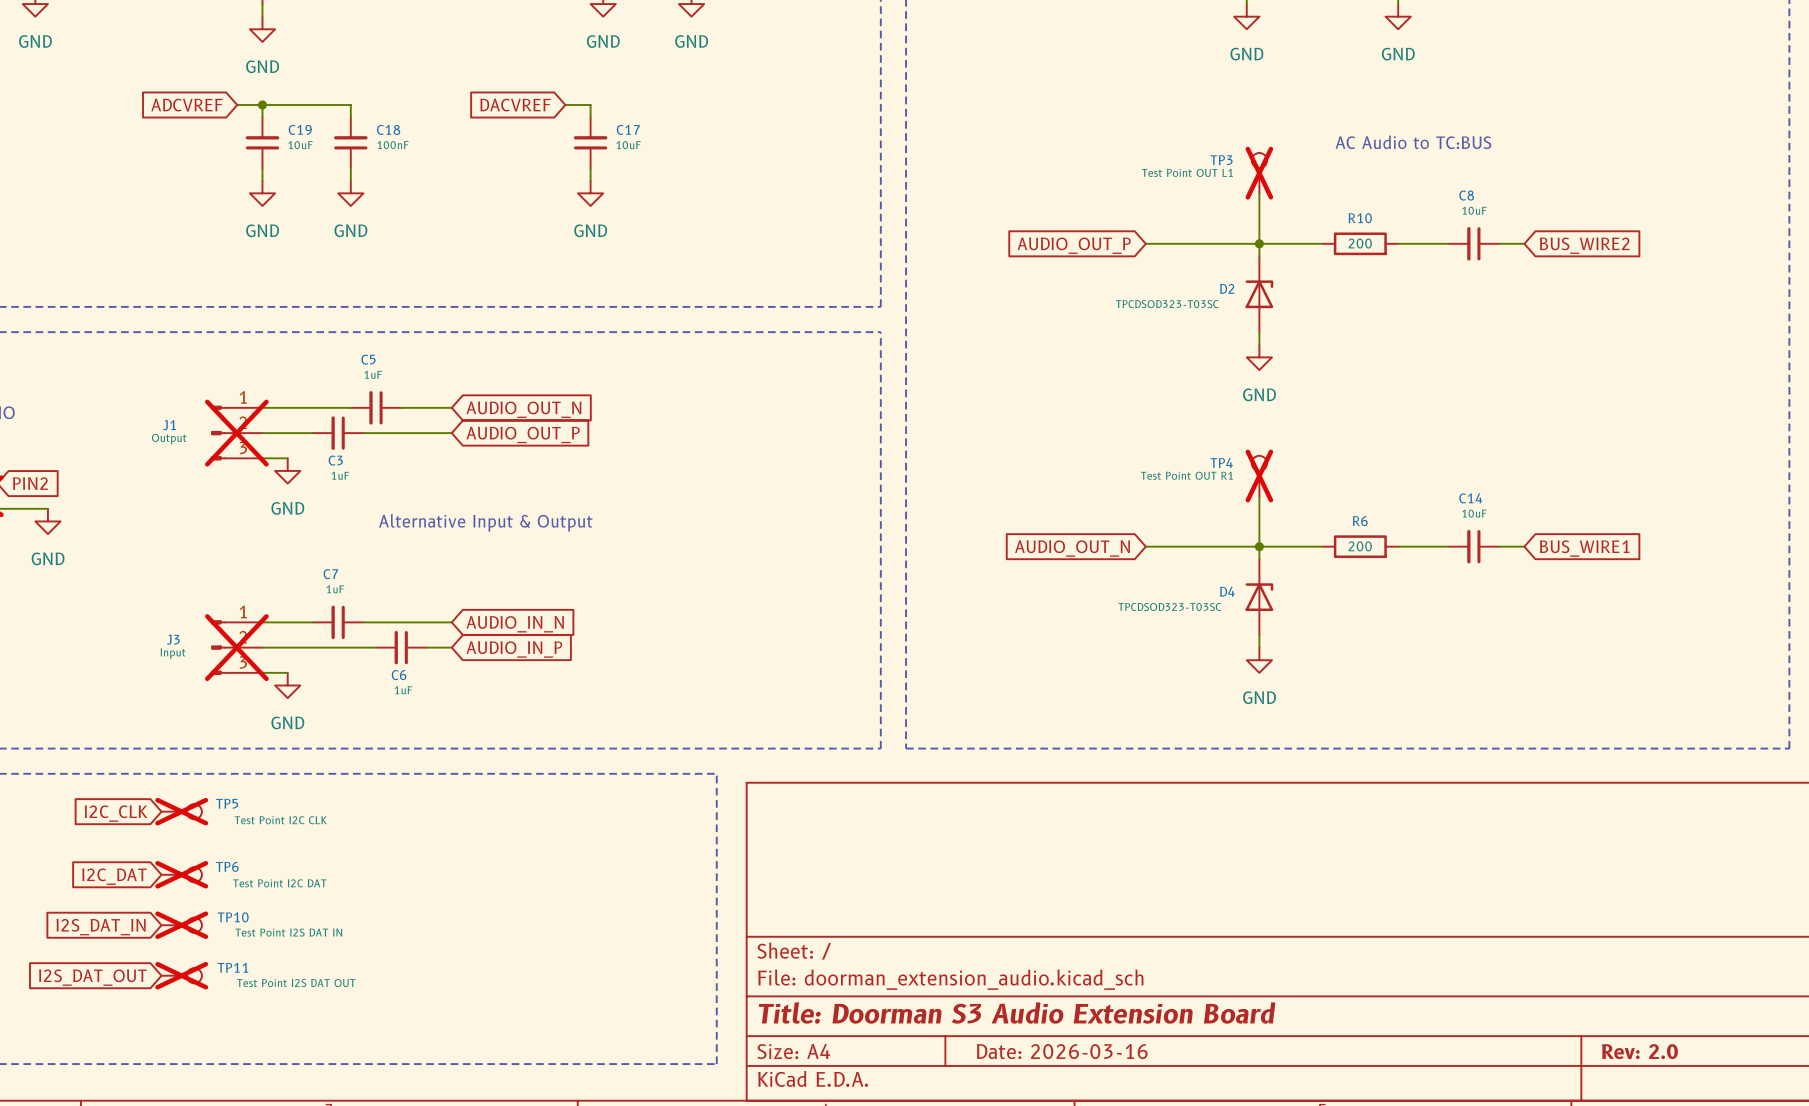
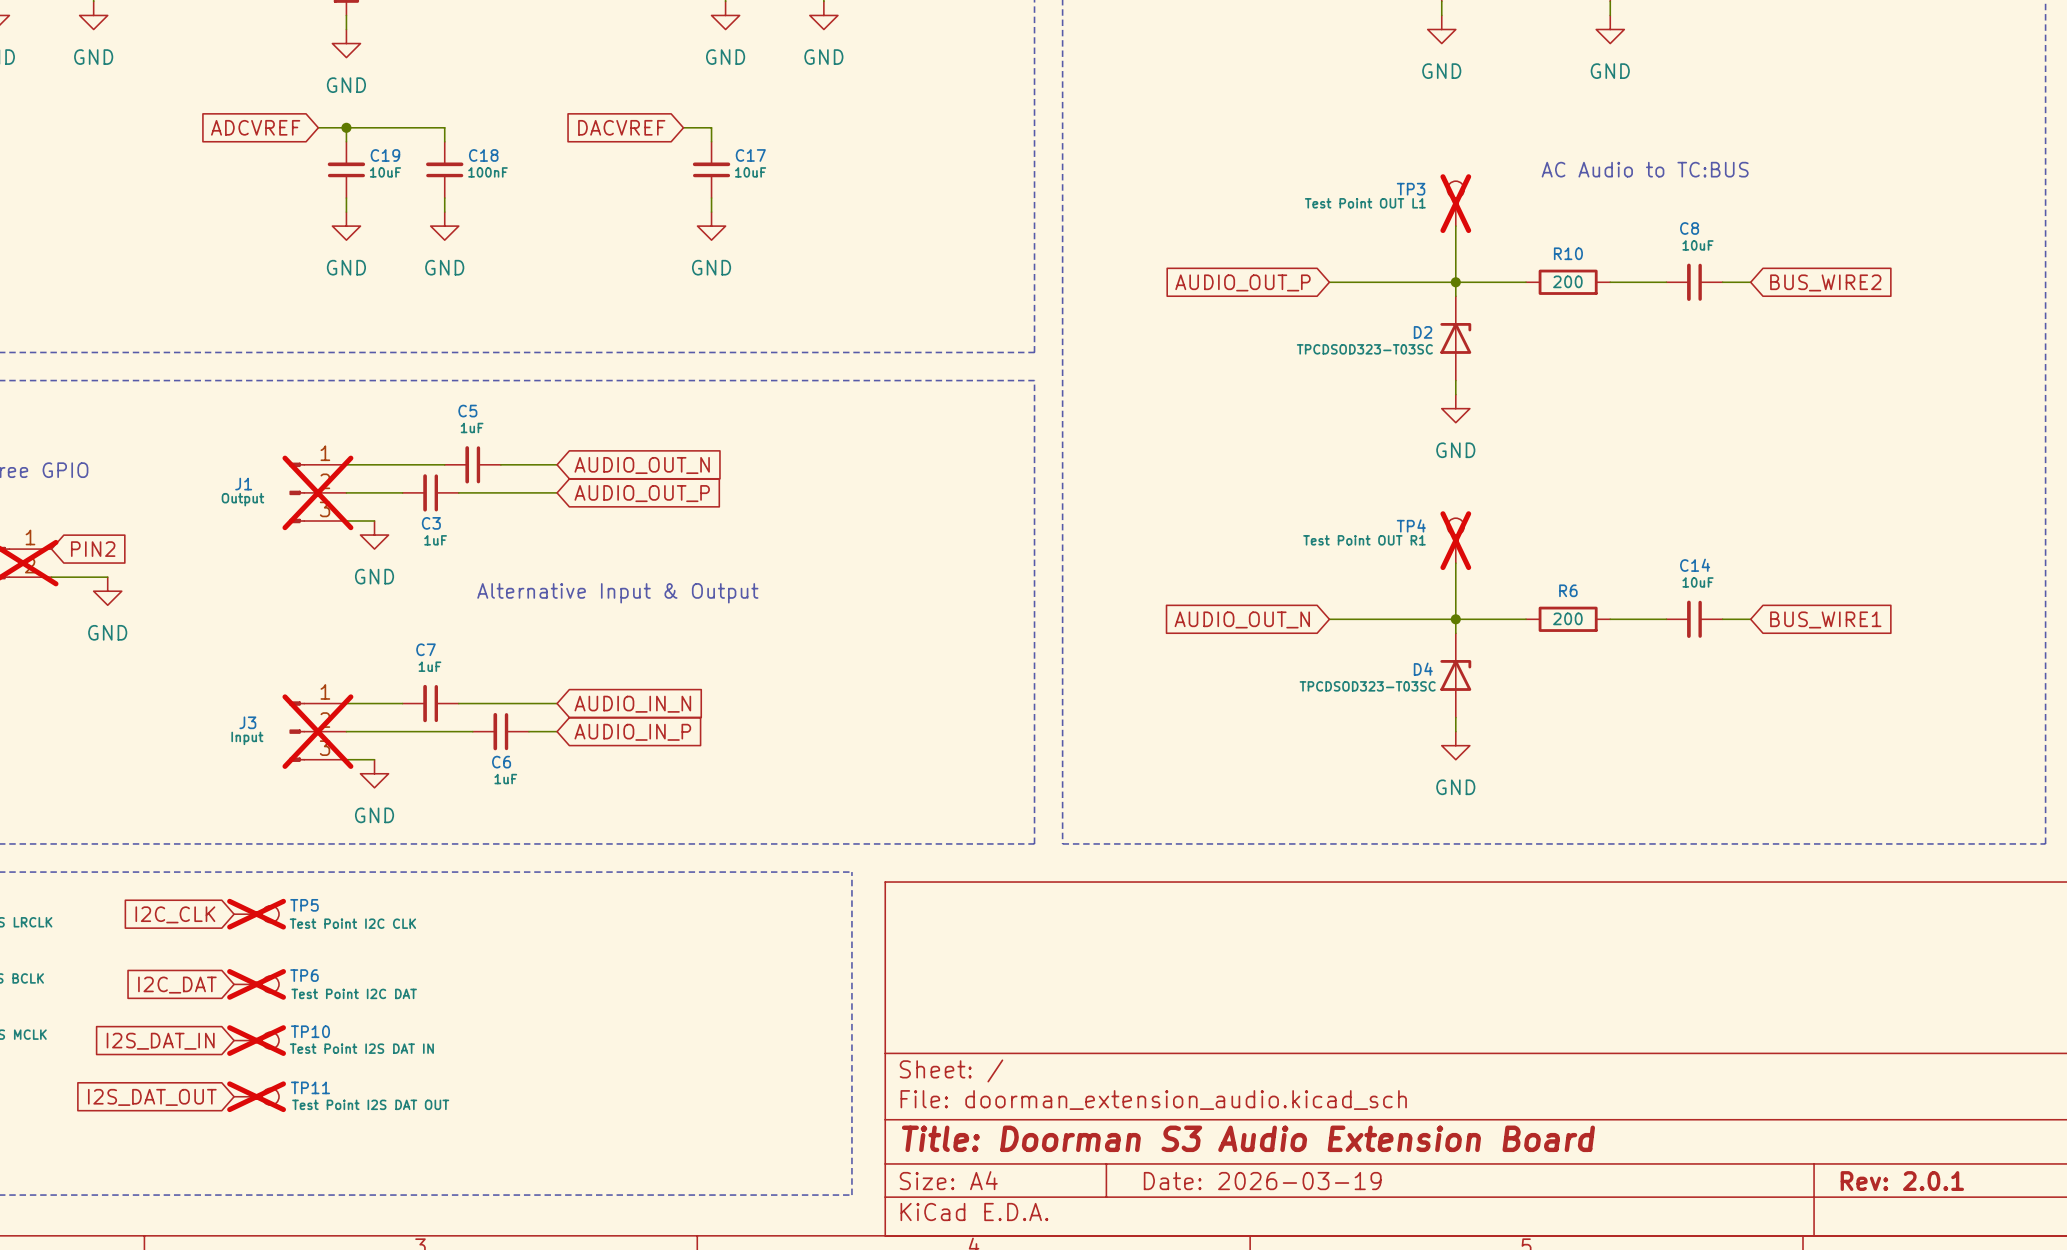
title block: Date: 2026-03-16 (1062, 1051) -> Date: 2026-03-19 (1262, 1181)
title block: Rev: 2.0 (1639, 1051) -> Rev: 2.0.1 (1902, 1181)

